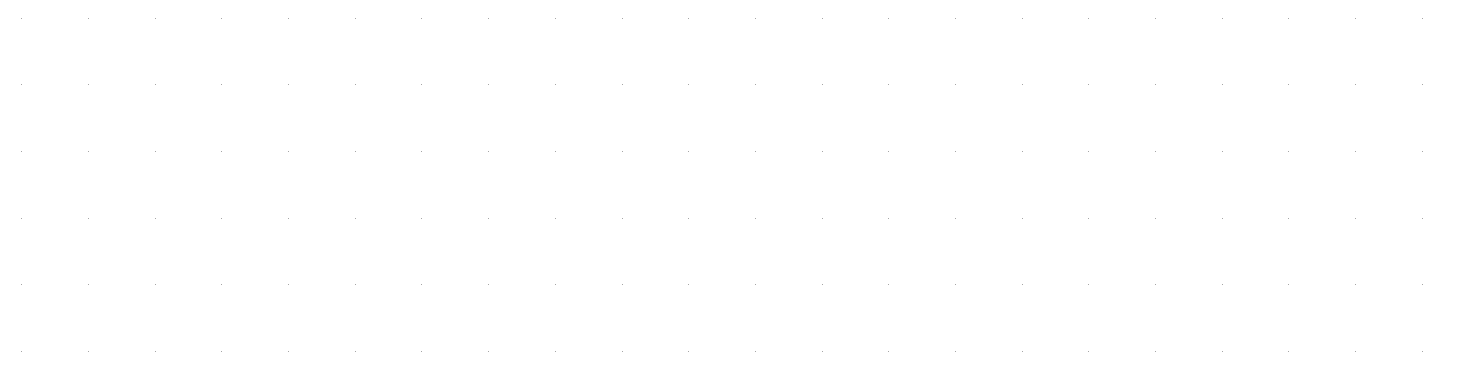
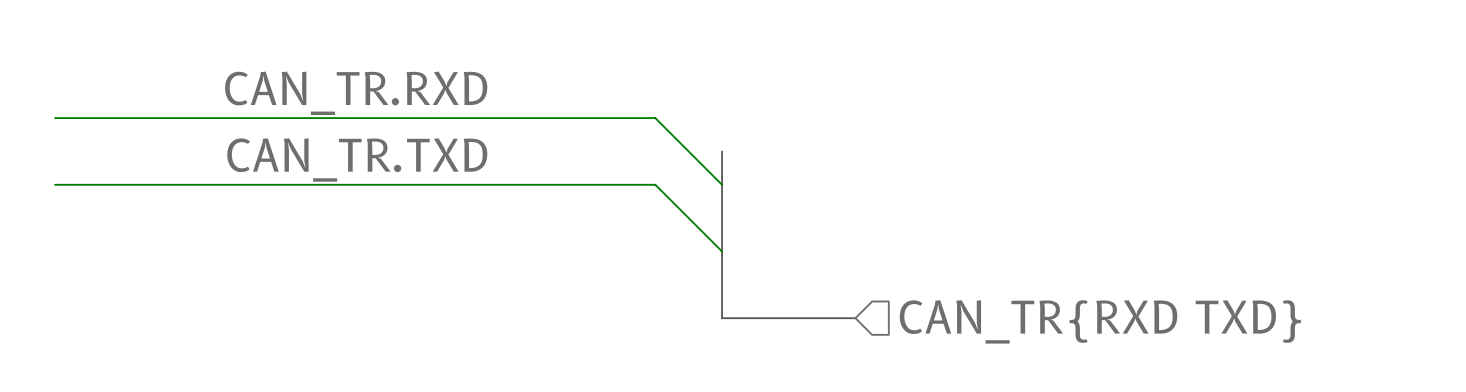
label: none -> CAN_TR.RXD (356, 93)
wire: none -> (55, 118) (655, 118) (722, 184)
bus: none -> (722, 151) (722, 318) (855, 318)
label: none -> CAN_TR.TXD (357, 160)
wire: none -> (55, 184) (655, 184) (722, 251)
hierarchical label: none -> CAN_TR{RXD TXD} (1100, 321)

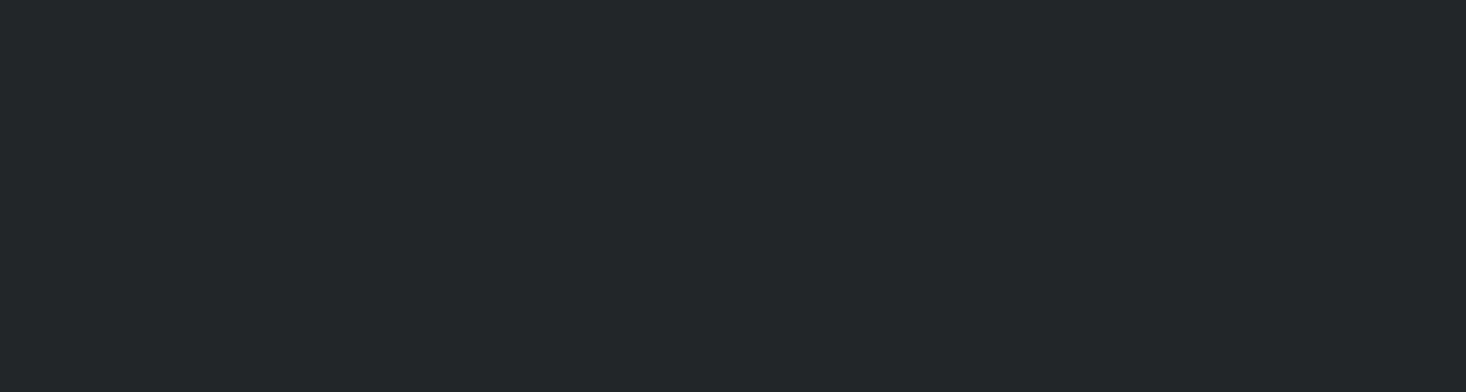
label: CAN_TR.RXD (356, 93) -> none
wire: (55, 118) (655, 118) (722, 184) -> none
bus: (722, 151) (722, 318) (855, 318) -> none
label: CAN_TR.TXD (357, 160) -> none
wire: (55, 184) (655, 184) (722, 251) -> none
hierarchical label: CAN_TR{RXD TXD} (1100, 321) -> none

